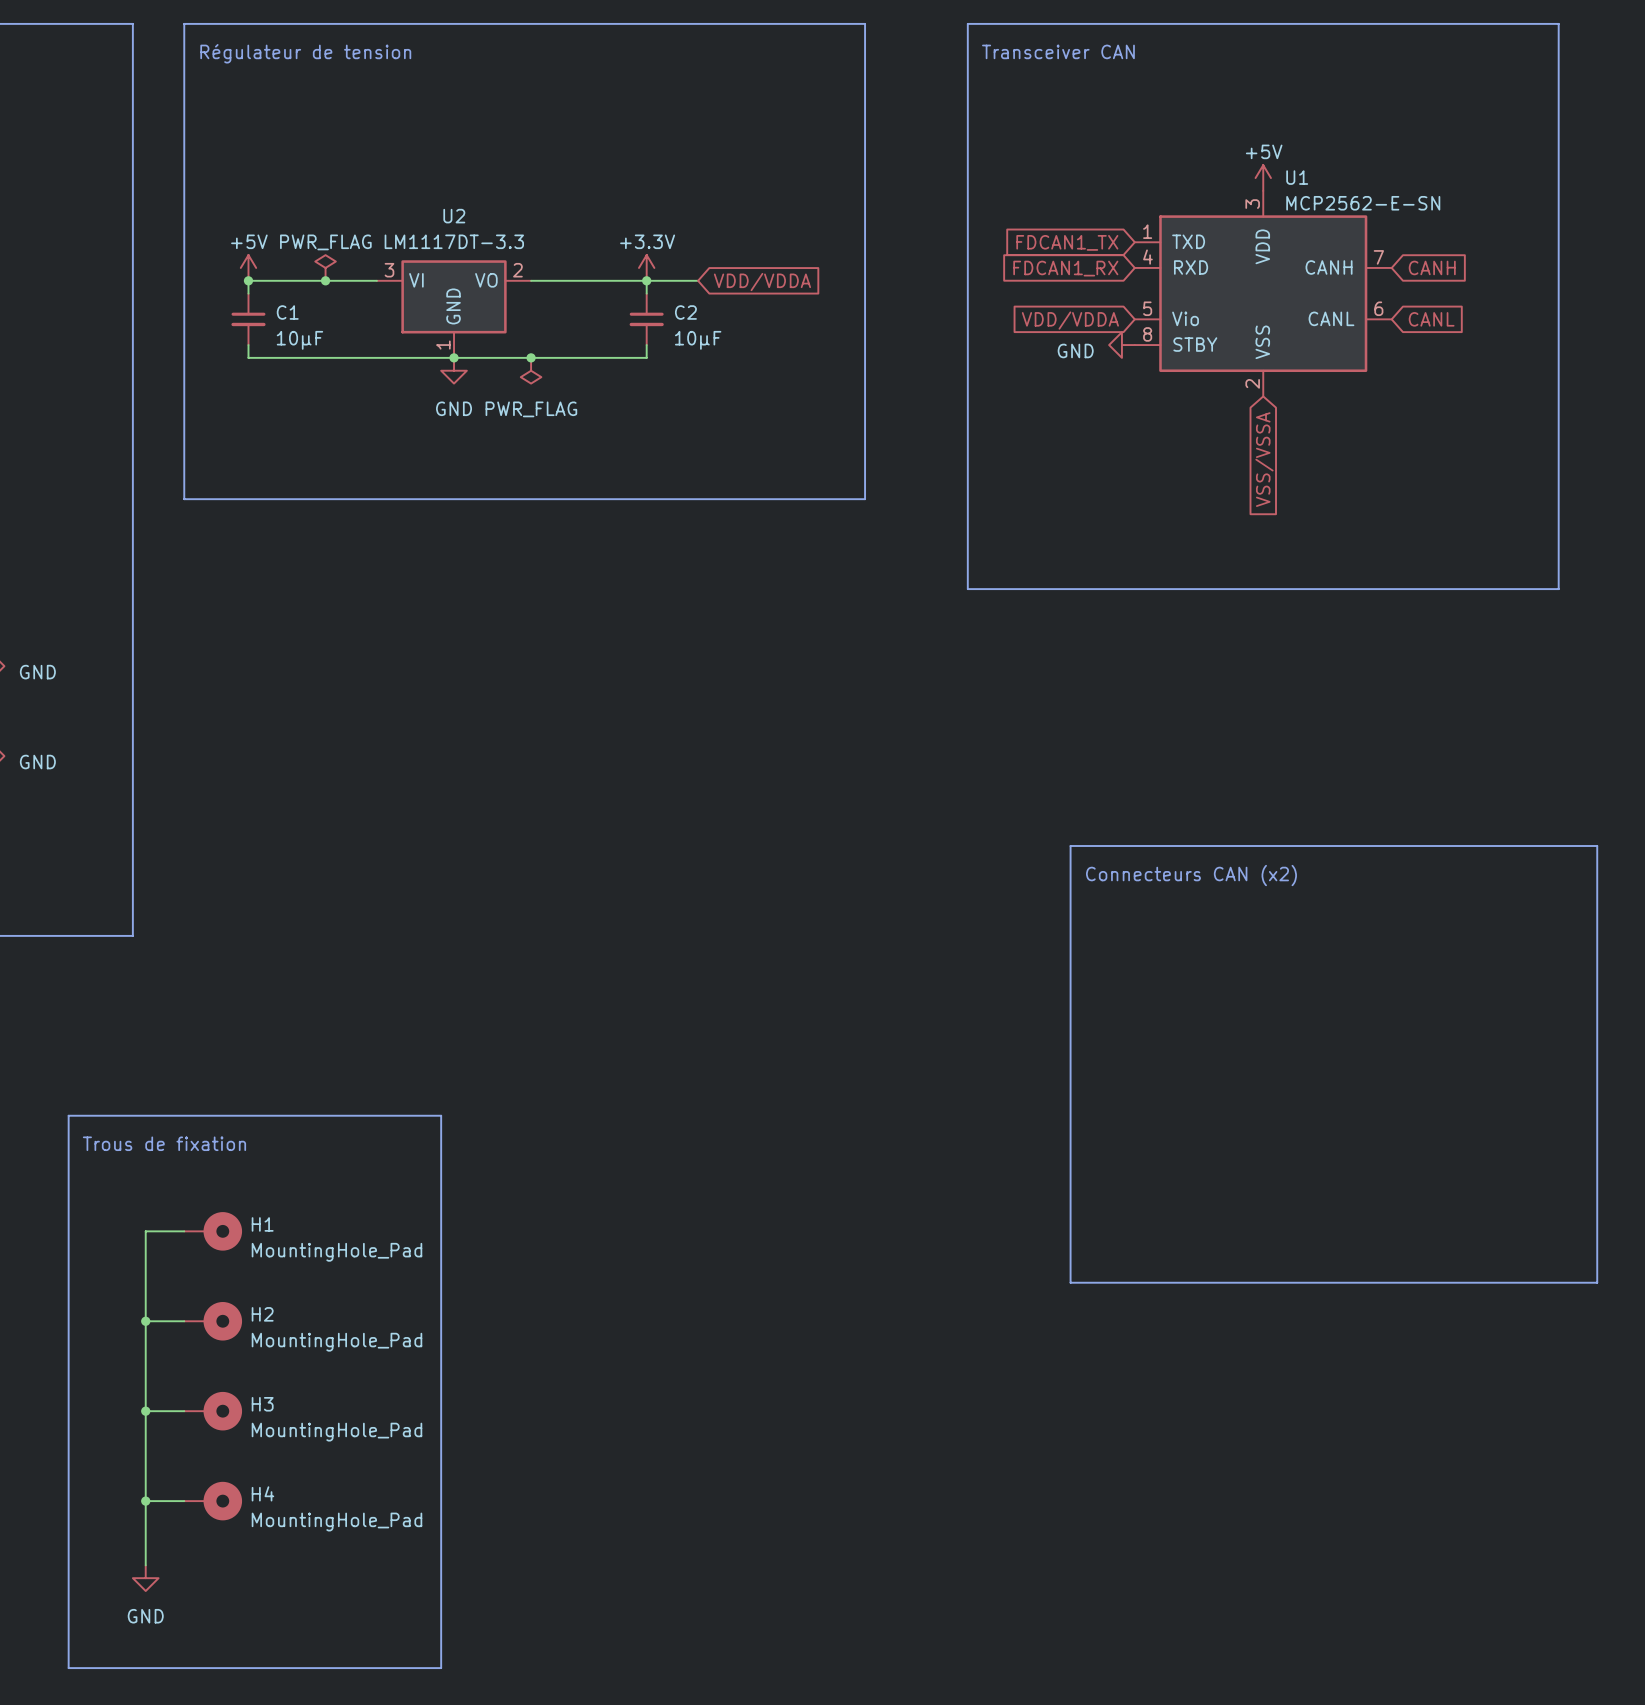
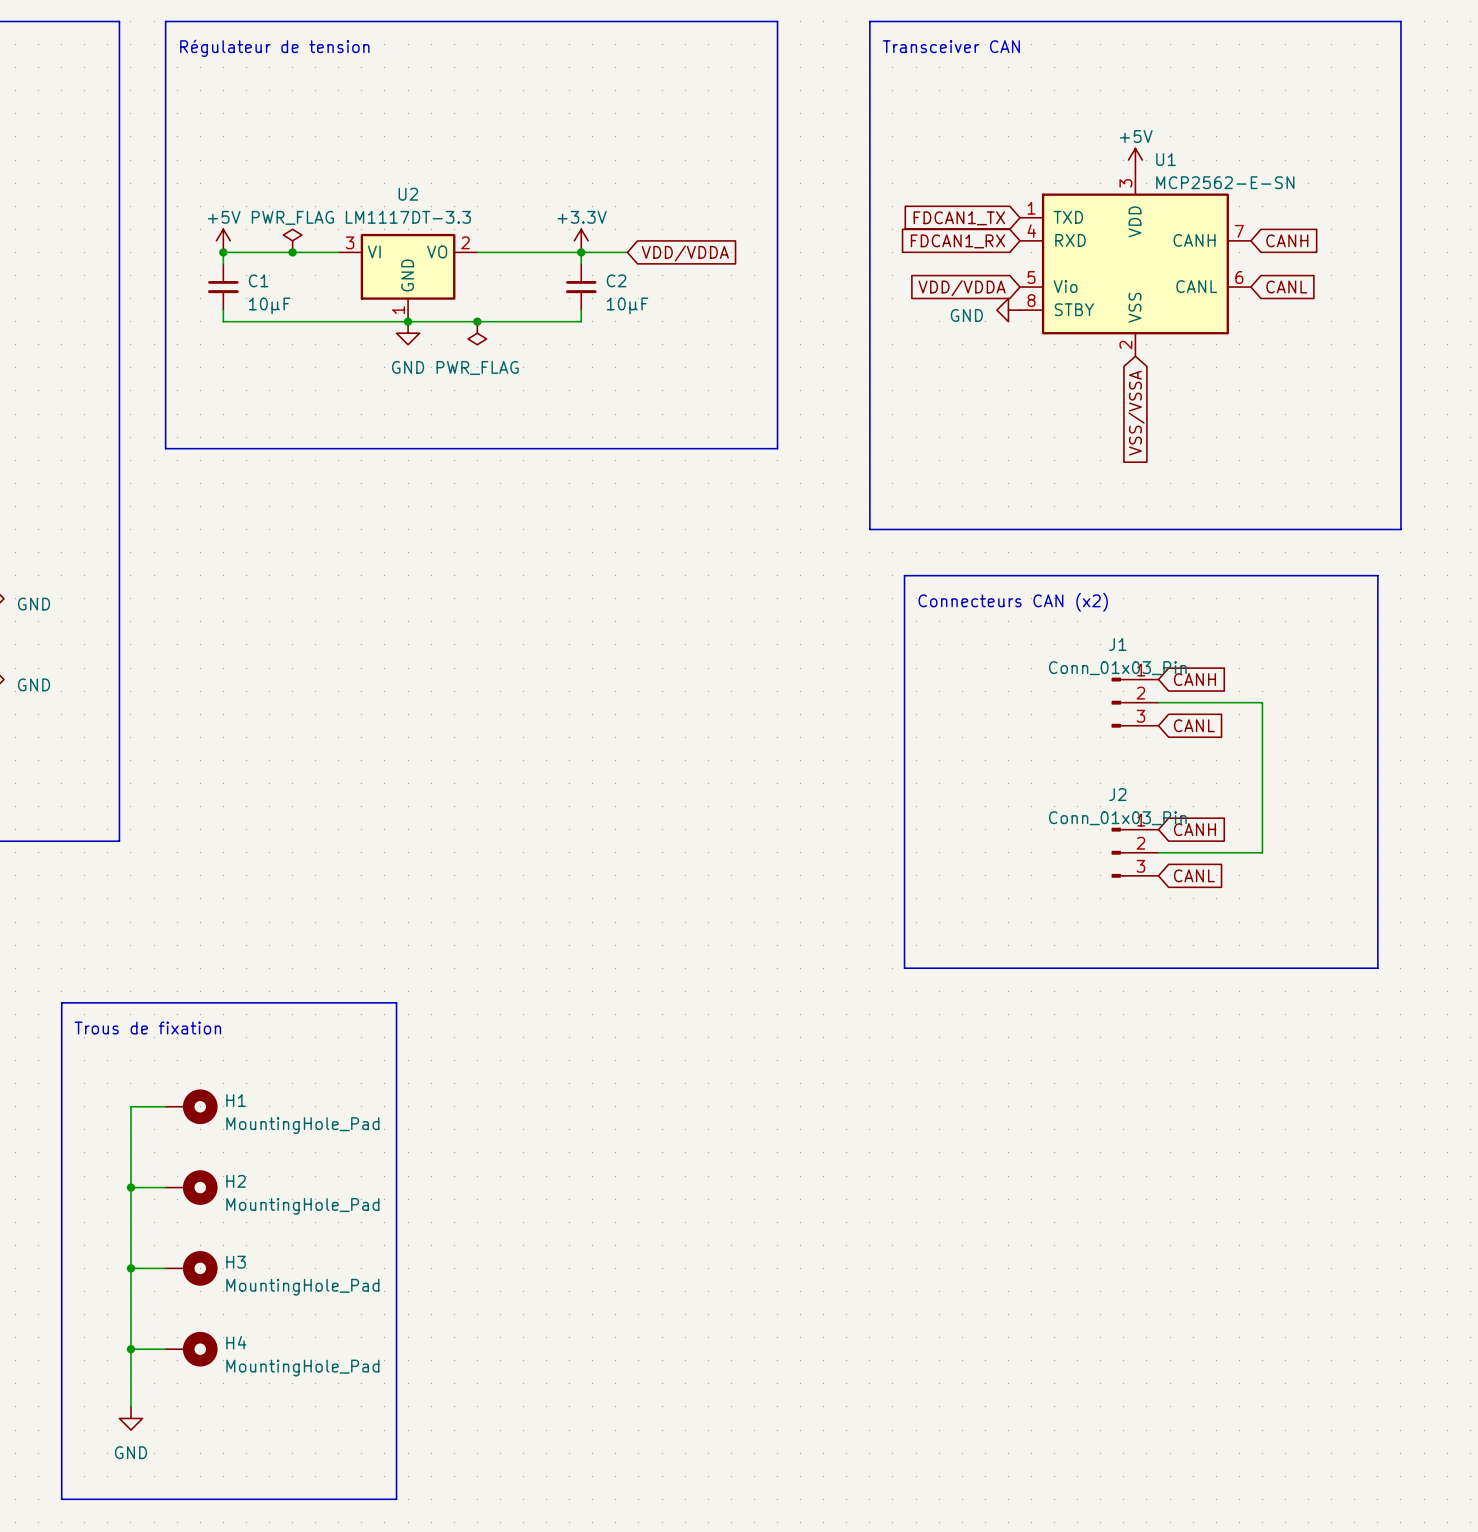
global label: none -> CANH (1194, 679)
J1: none -> Conn_01x03_Pin (1135, 702)
wire: none -> (1158, 702) (1262, 702) (1262, 852) (1158, 852)
global label: none -> CANL (1194, 725)
line: (1070, 846) (1597, 846) (1597, 1282) (1070, 1282) (1070, 846) -> (904, 575) (1377, 575) (1377, 968) (904, 968) (904, 575)
text position: Connecteurs CAN (x2) (1191, 875) -> Connecteurs CAN (x2) (1013, 602)
global label: none -> CANH (1194, 829)
J2: none -> Conn_01x03_Pin (1135, 852)
global label: none -> CANL (1194, 875)

